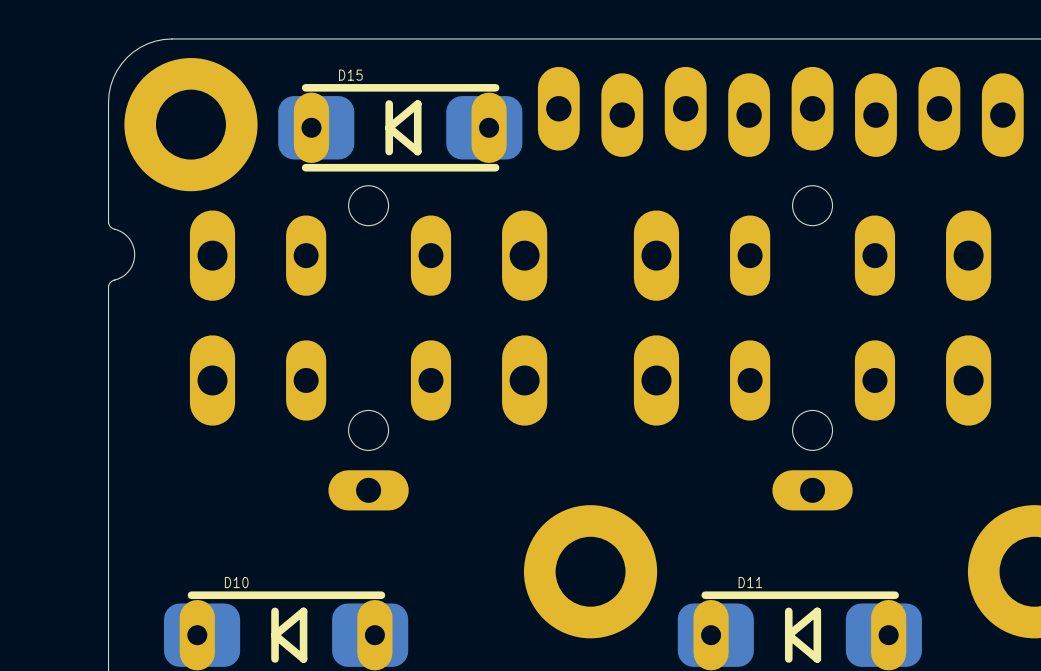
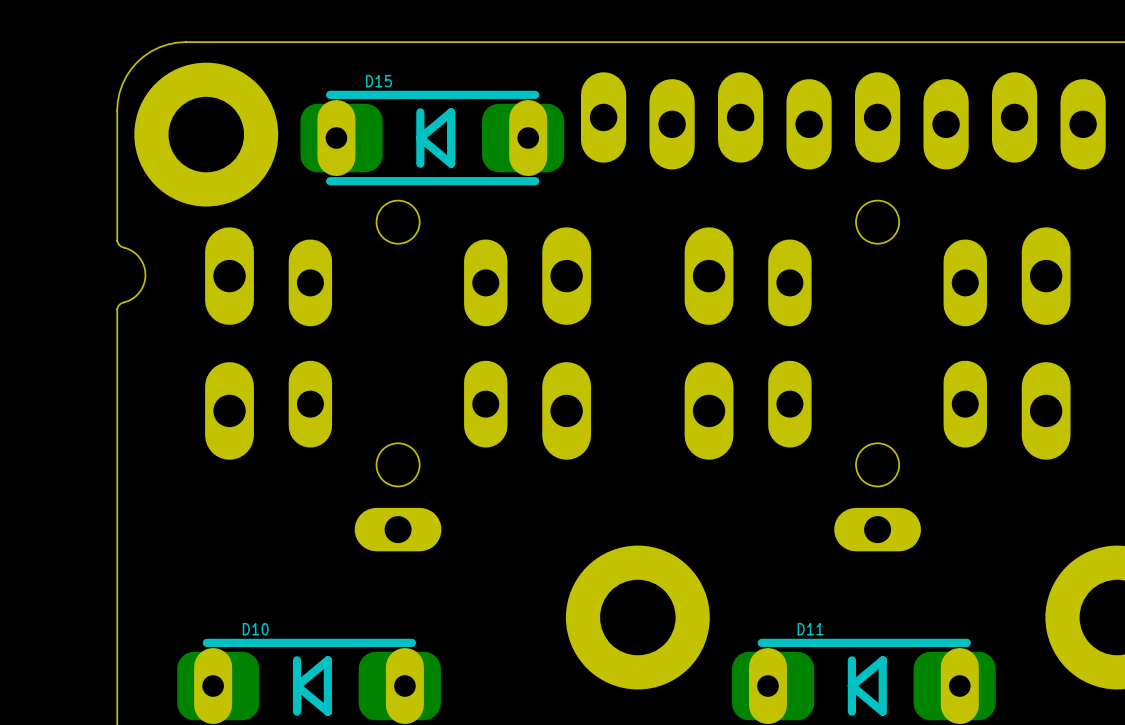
part footprint: [189, 185, 548, 511] -> [205, 200, 592, 552]
part footprint: [633, 185, 992, 511] -> [684, 200, 1071, 552]

